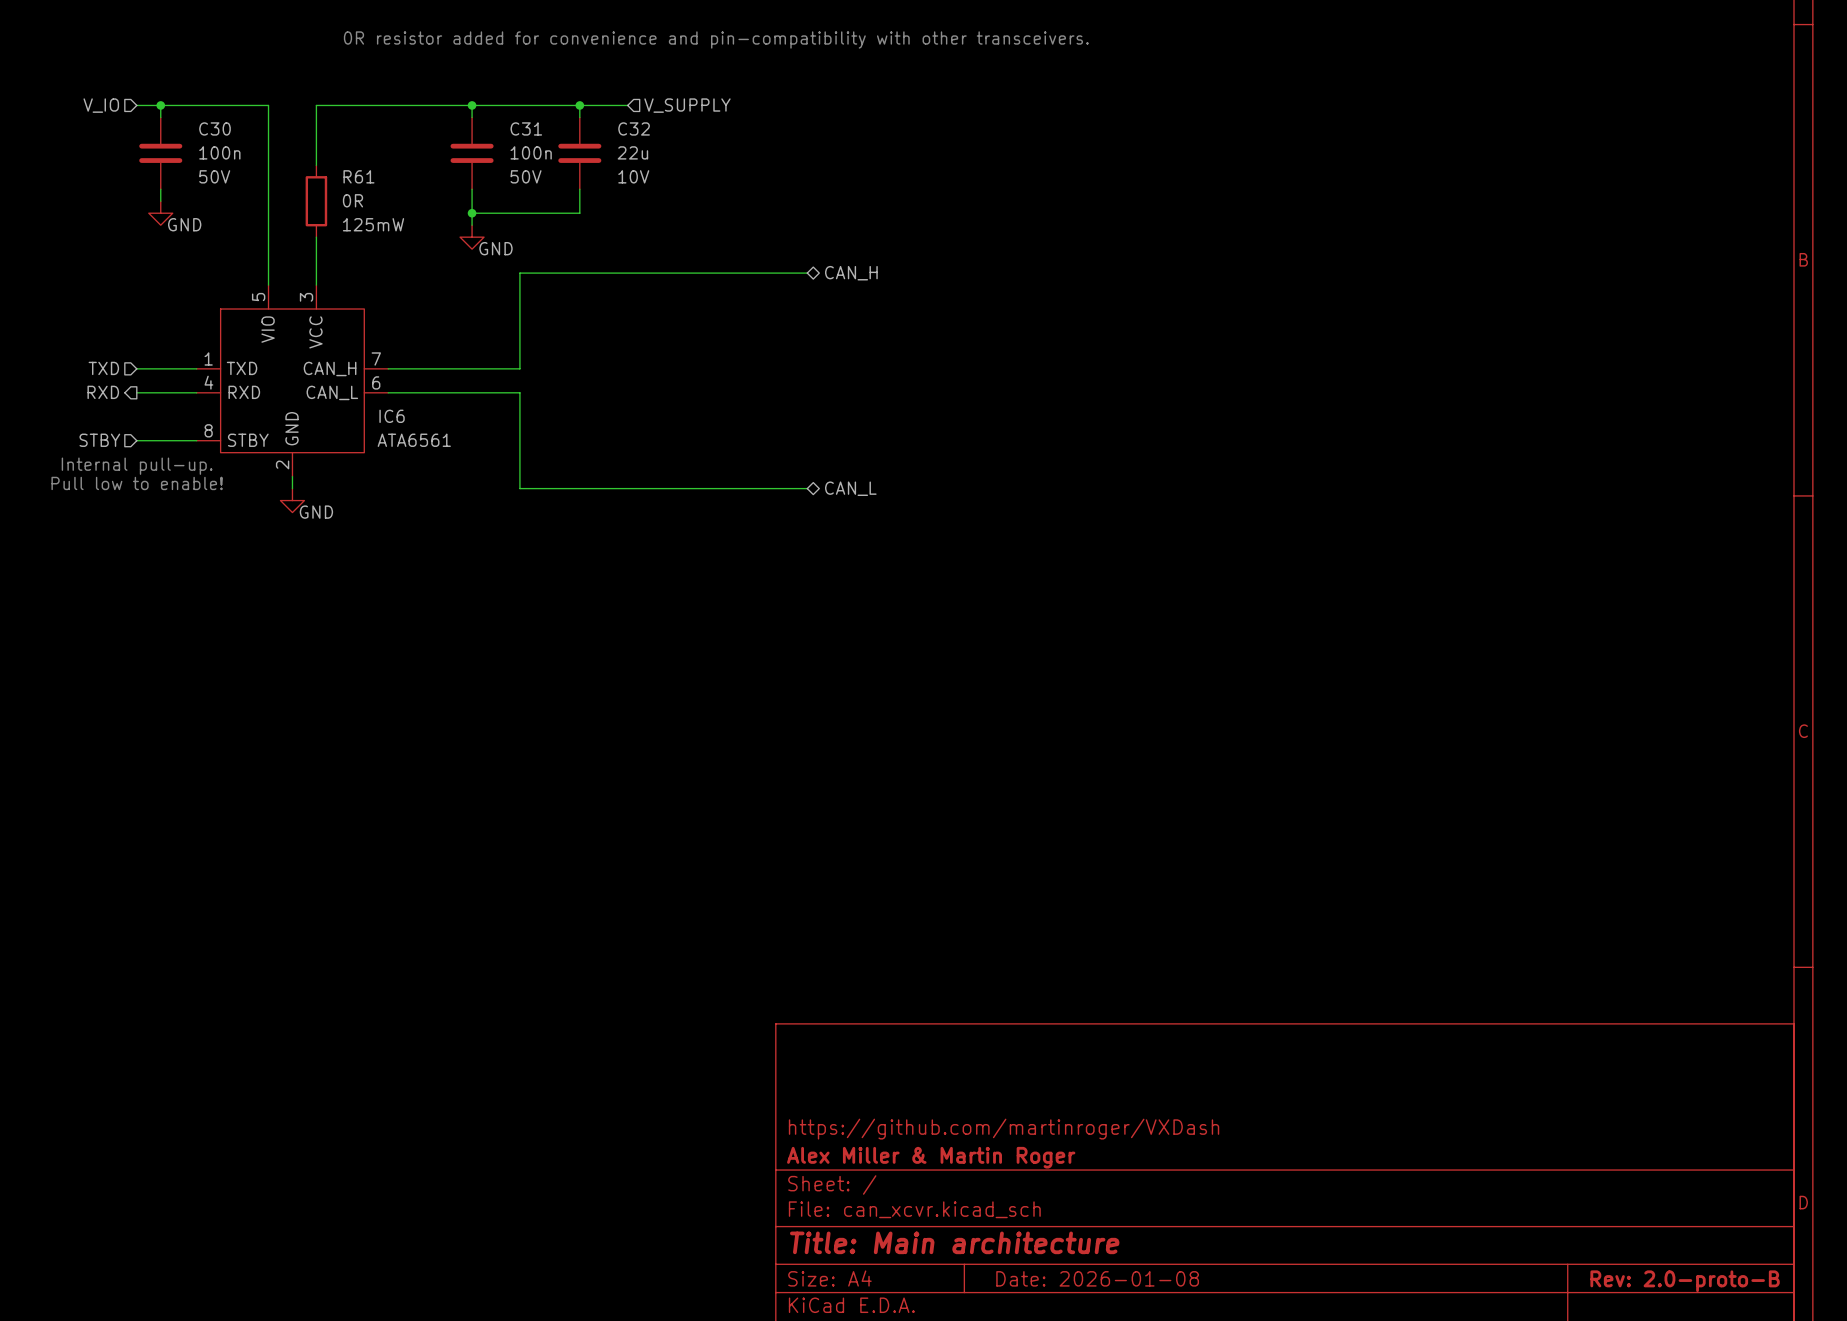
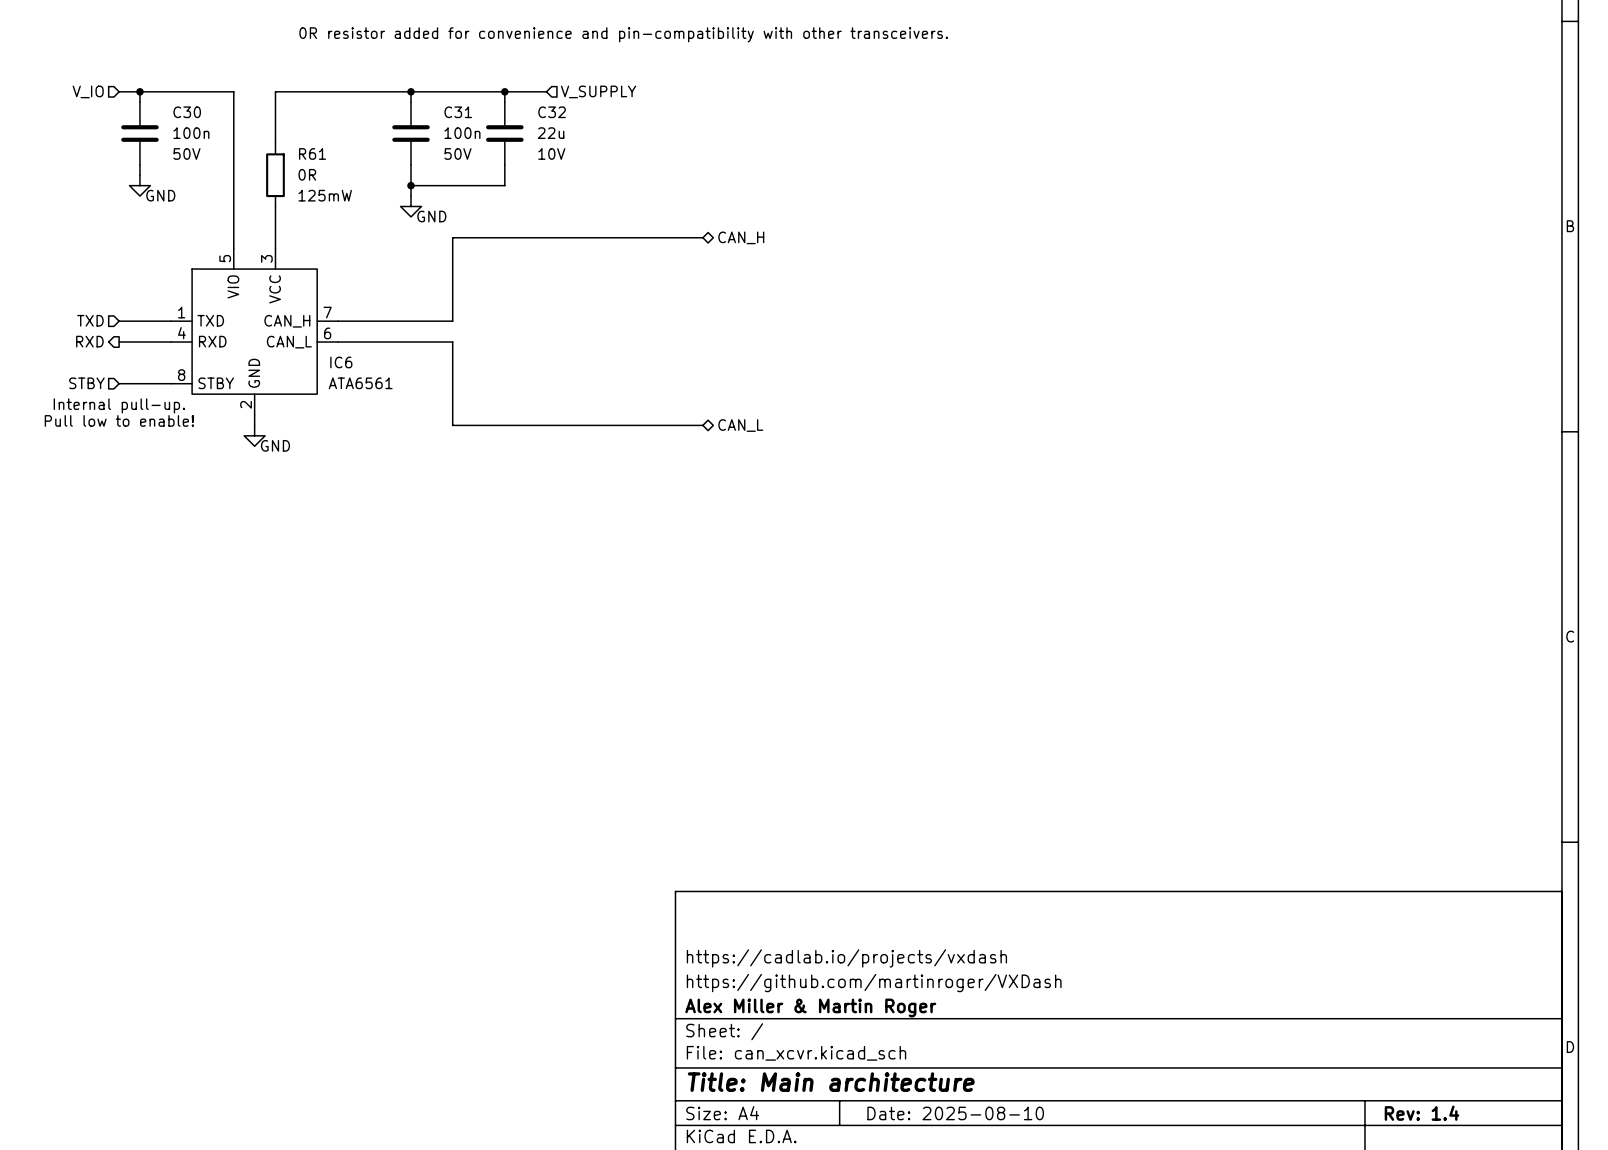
title block: none -> https://cadlab.io/projects/vxdash (846, 958)
title block: Date: 2026-01-08 (1097, 1278) -> Date: 2025-08-10 (955, 1113)
title block: Rev: 2.0-proto-B (1685, 1281) -> Rev: 1.4 (1422, 1113)

